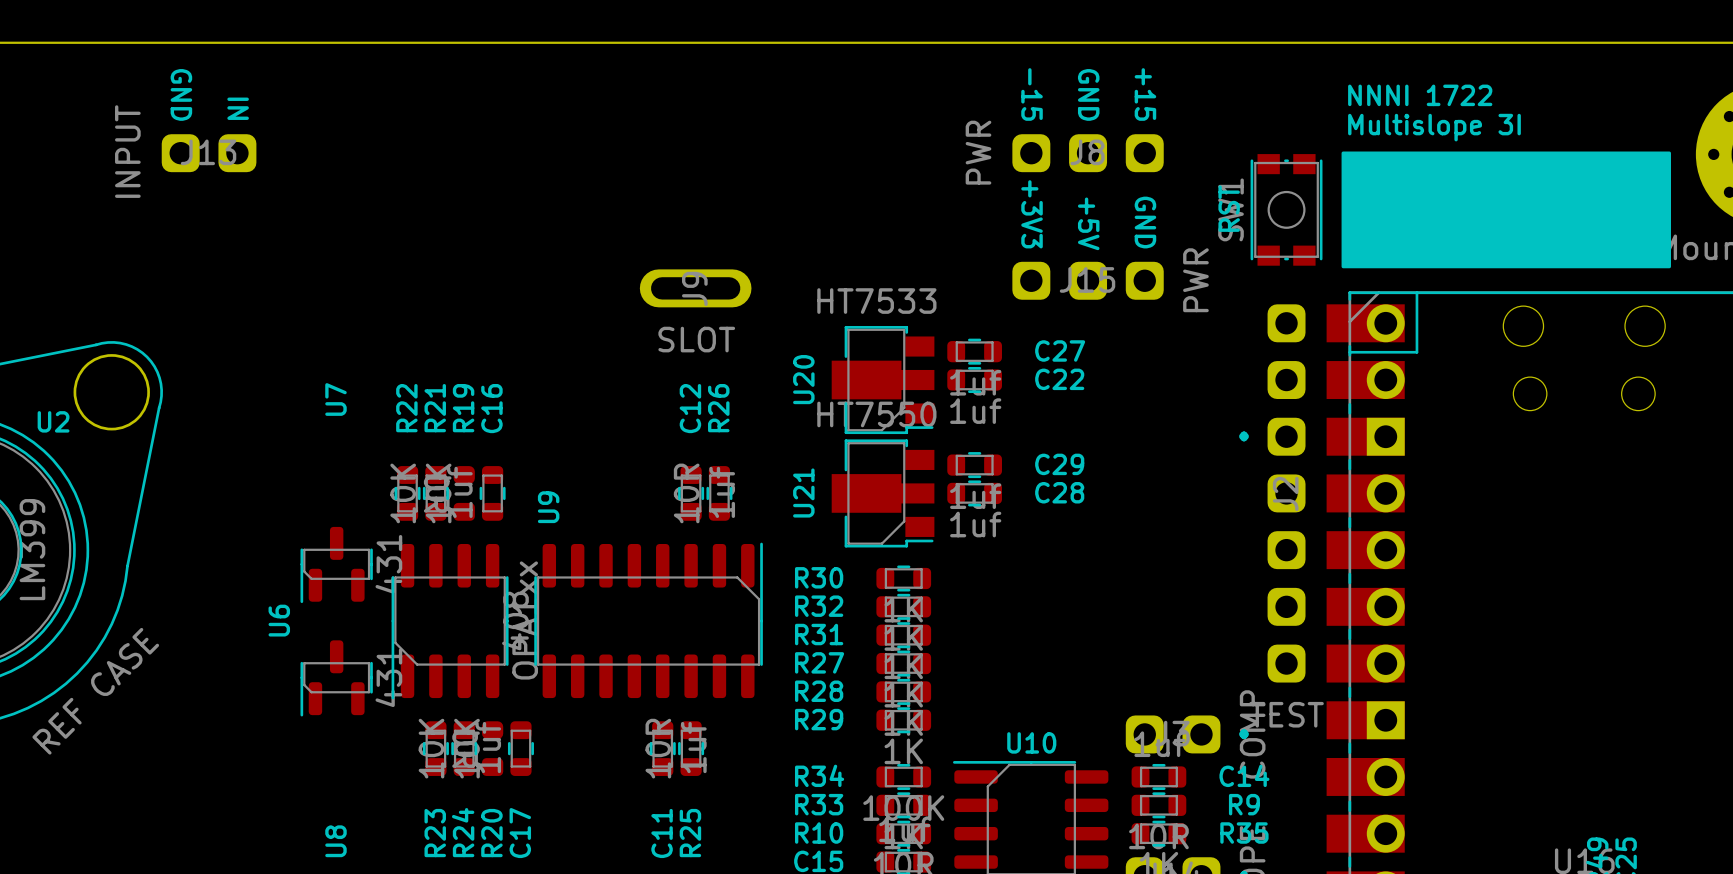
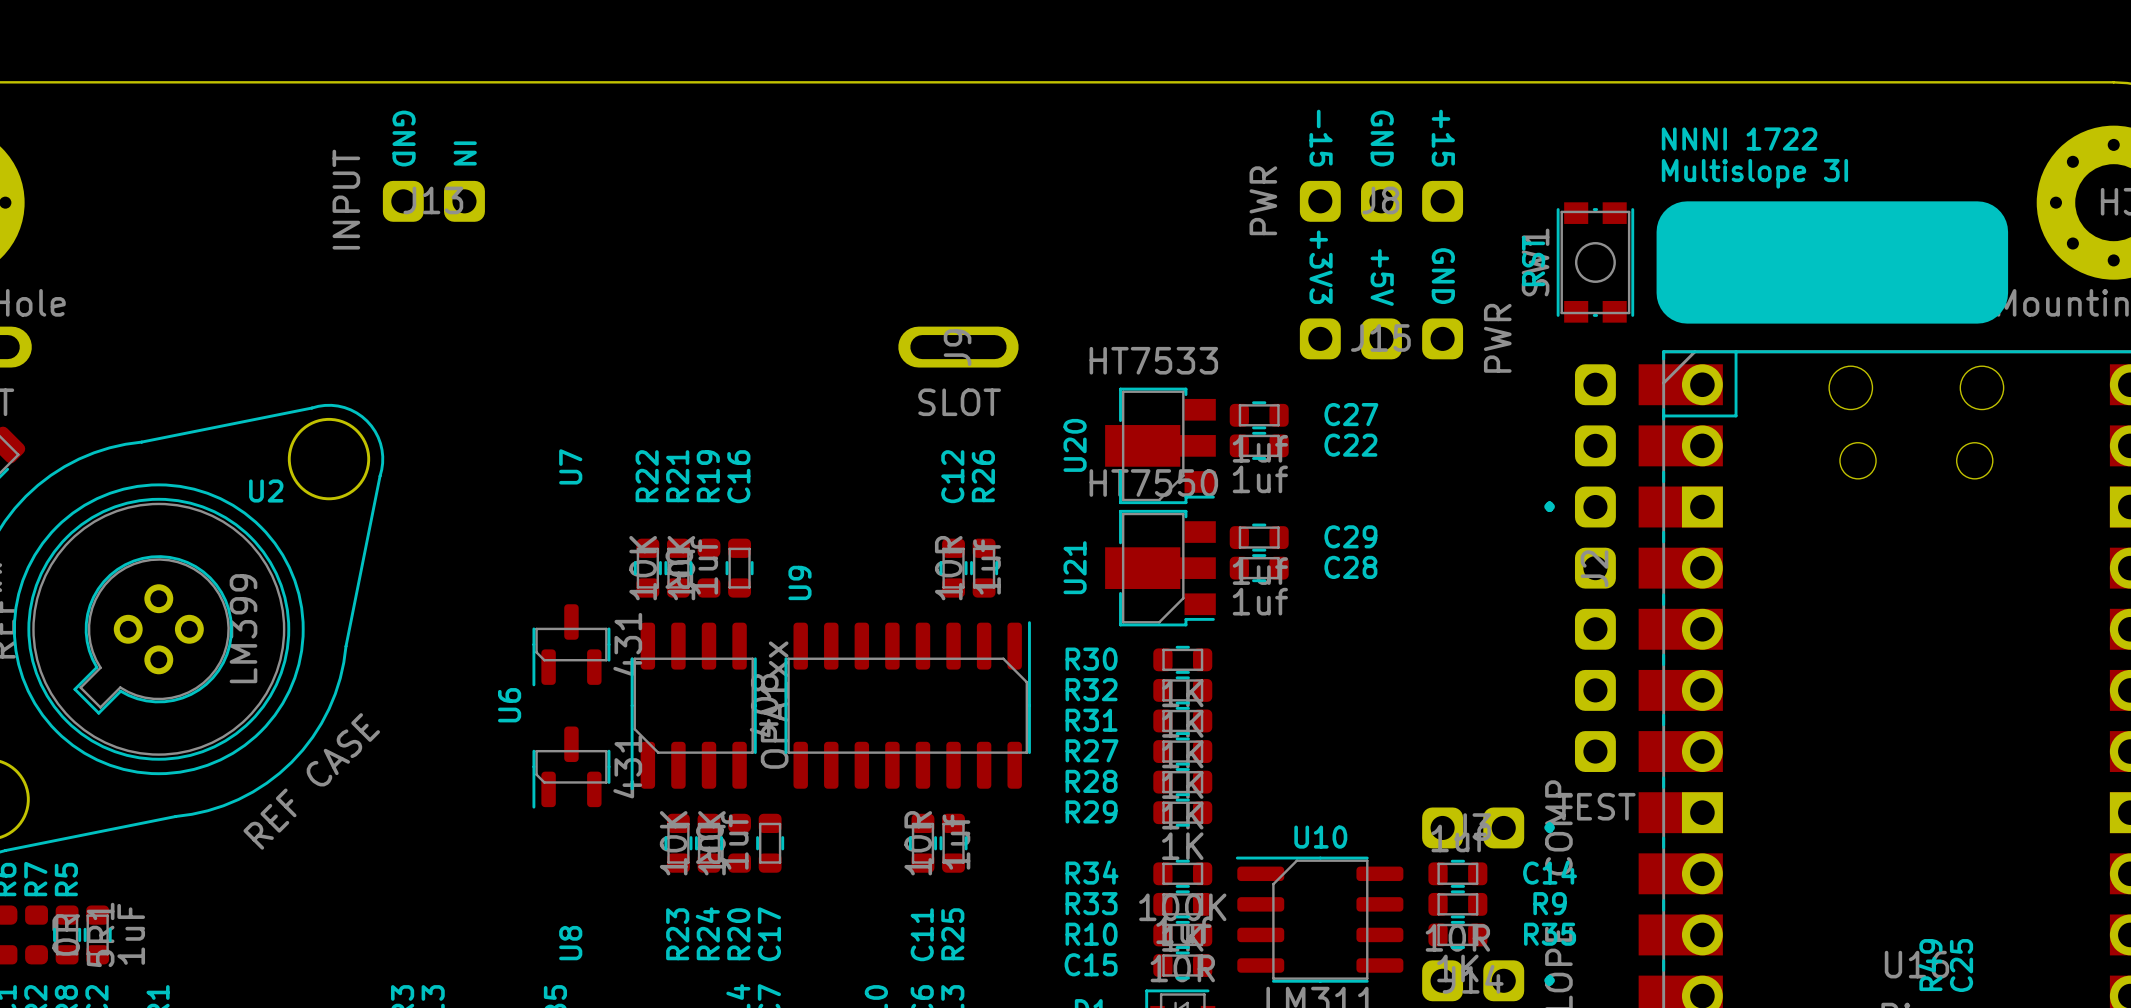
drawing shape: [1341, 151, 1671, 269] -> [1656, 201, 2009, 324]

